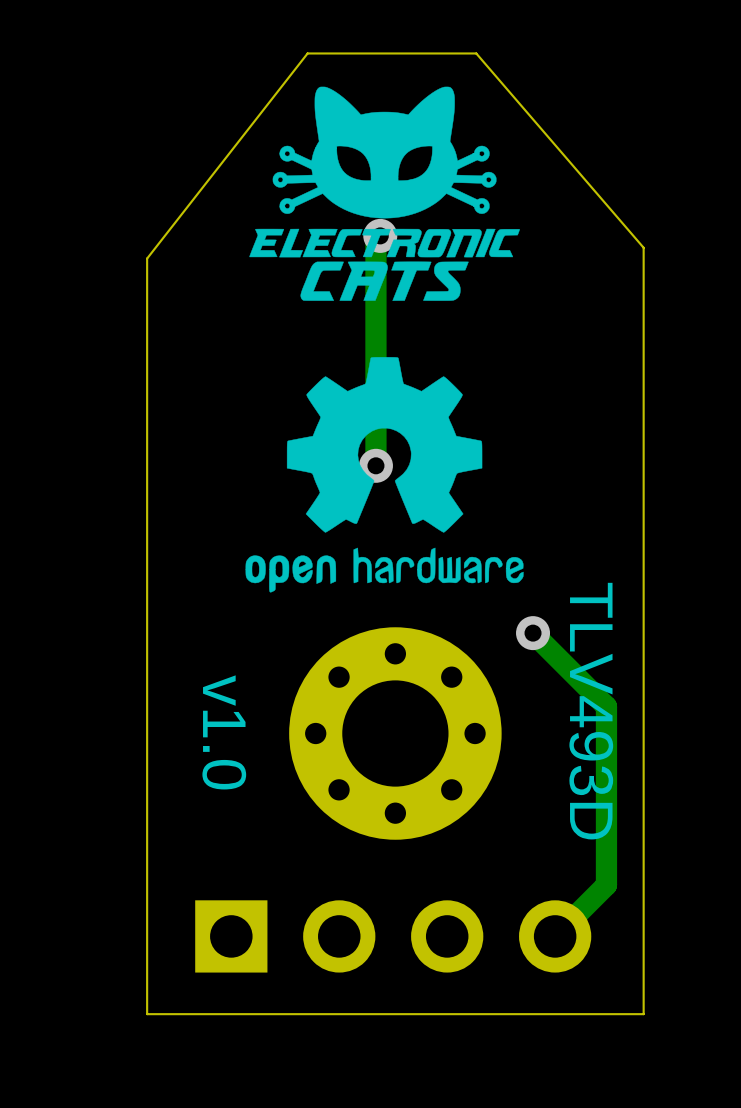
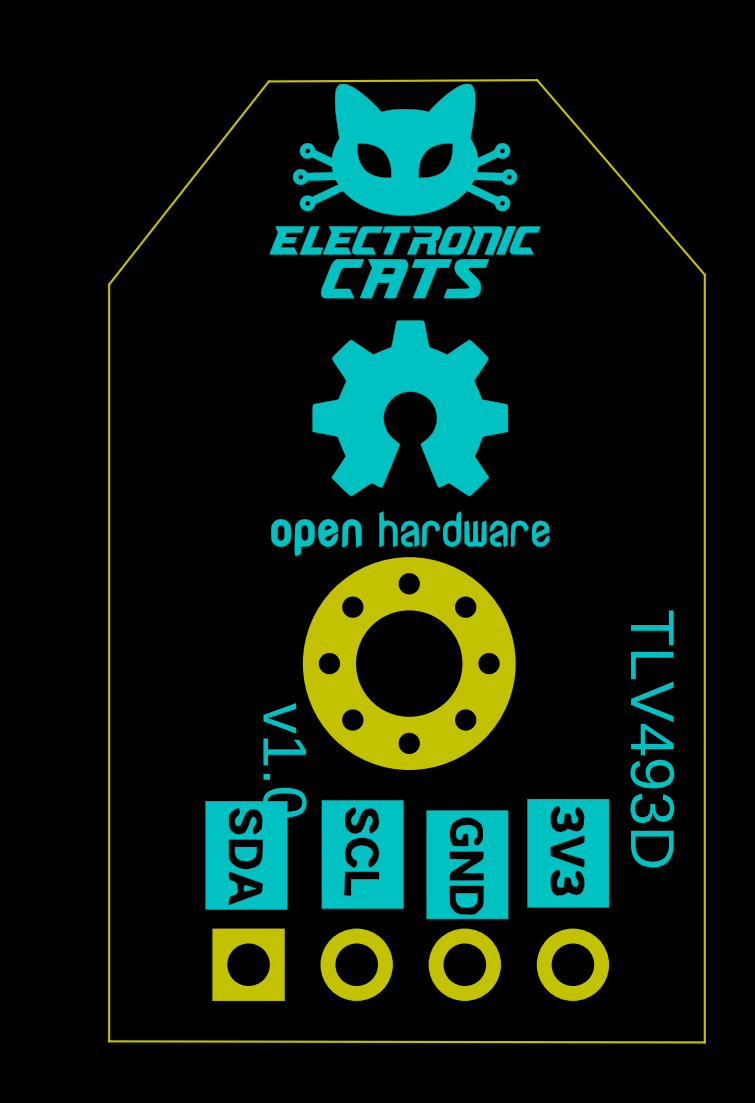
board edge: (476, 53) (307, 53) (147, 258) (147, 1014) (643, 1014) -> (537, 80) (268, 81) (109, 284) (109, 1041) (704, 1042)
drawing position: (384, 193) -> (404, 191)
track: (380, 235) (375, 240) (375, 465) -> none
via: (380, 235) -> none
via: (375, 465) -> none
drawing position: (384, 474) -> (410, 438)
track: (533, 633) (606, 706) (606, 885) (555, 936) -> none
via: (533, 633) -> none
part position: (395, 733) -> (409, 663)
drawing: none -> [205, 798, 610, 919]
part position: (393, 936) -> (410, 964)

